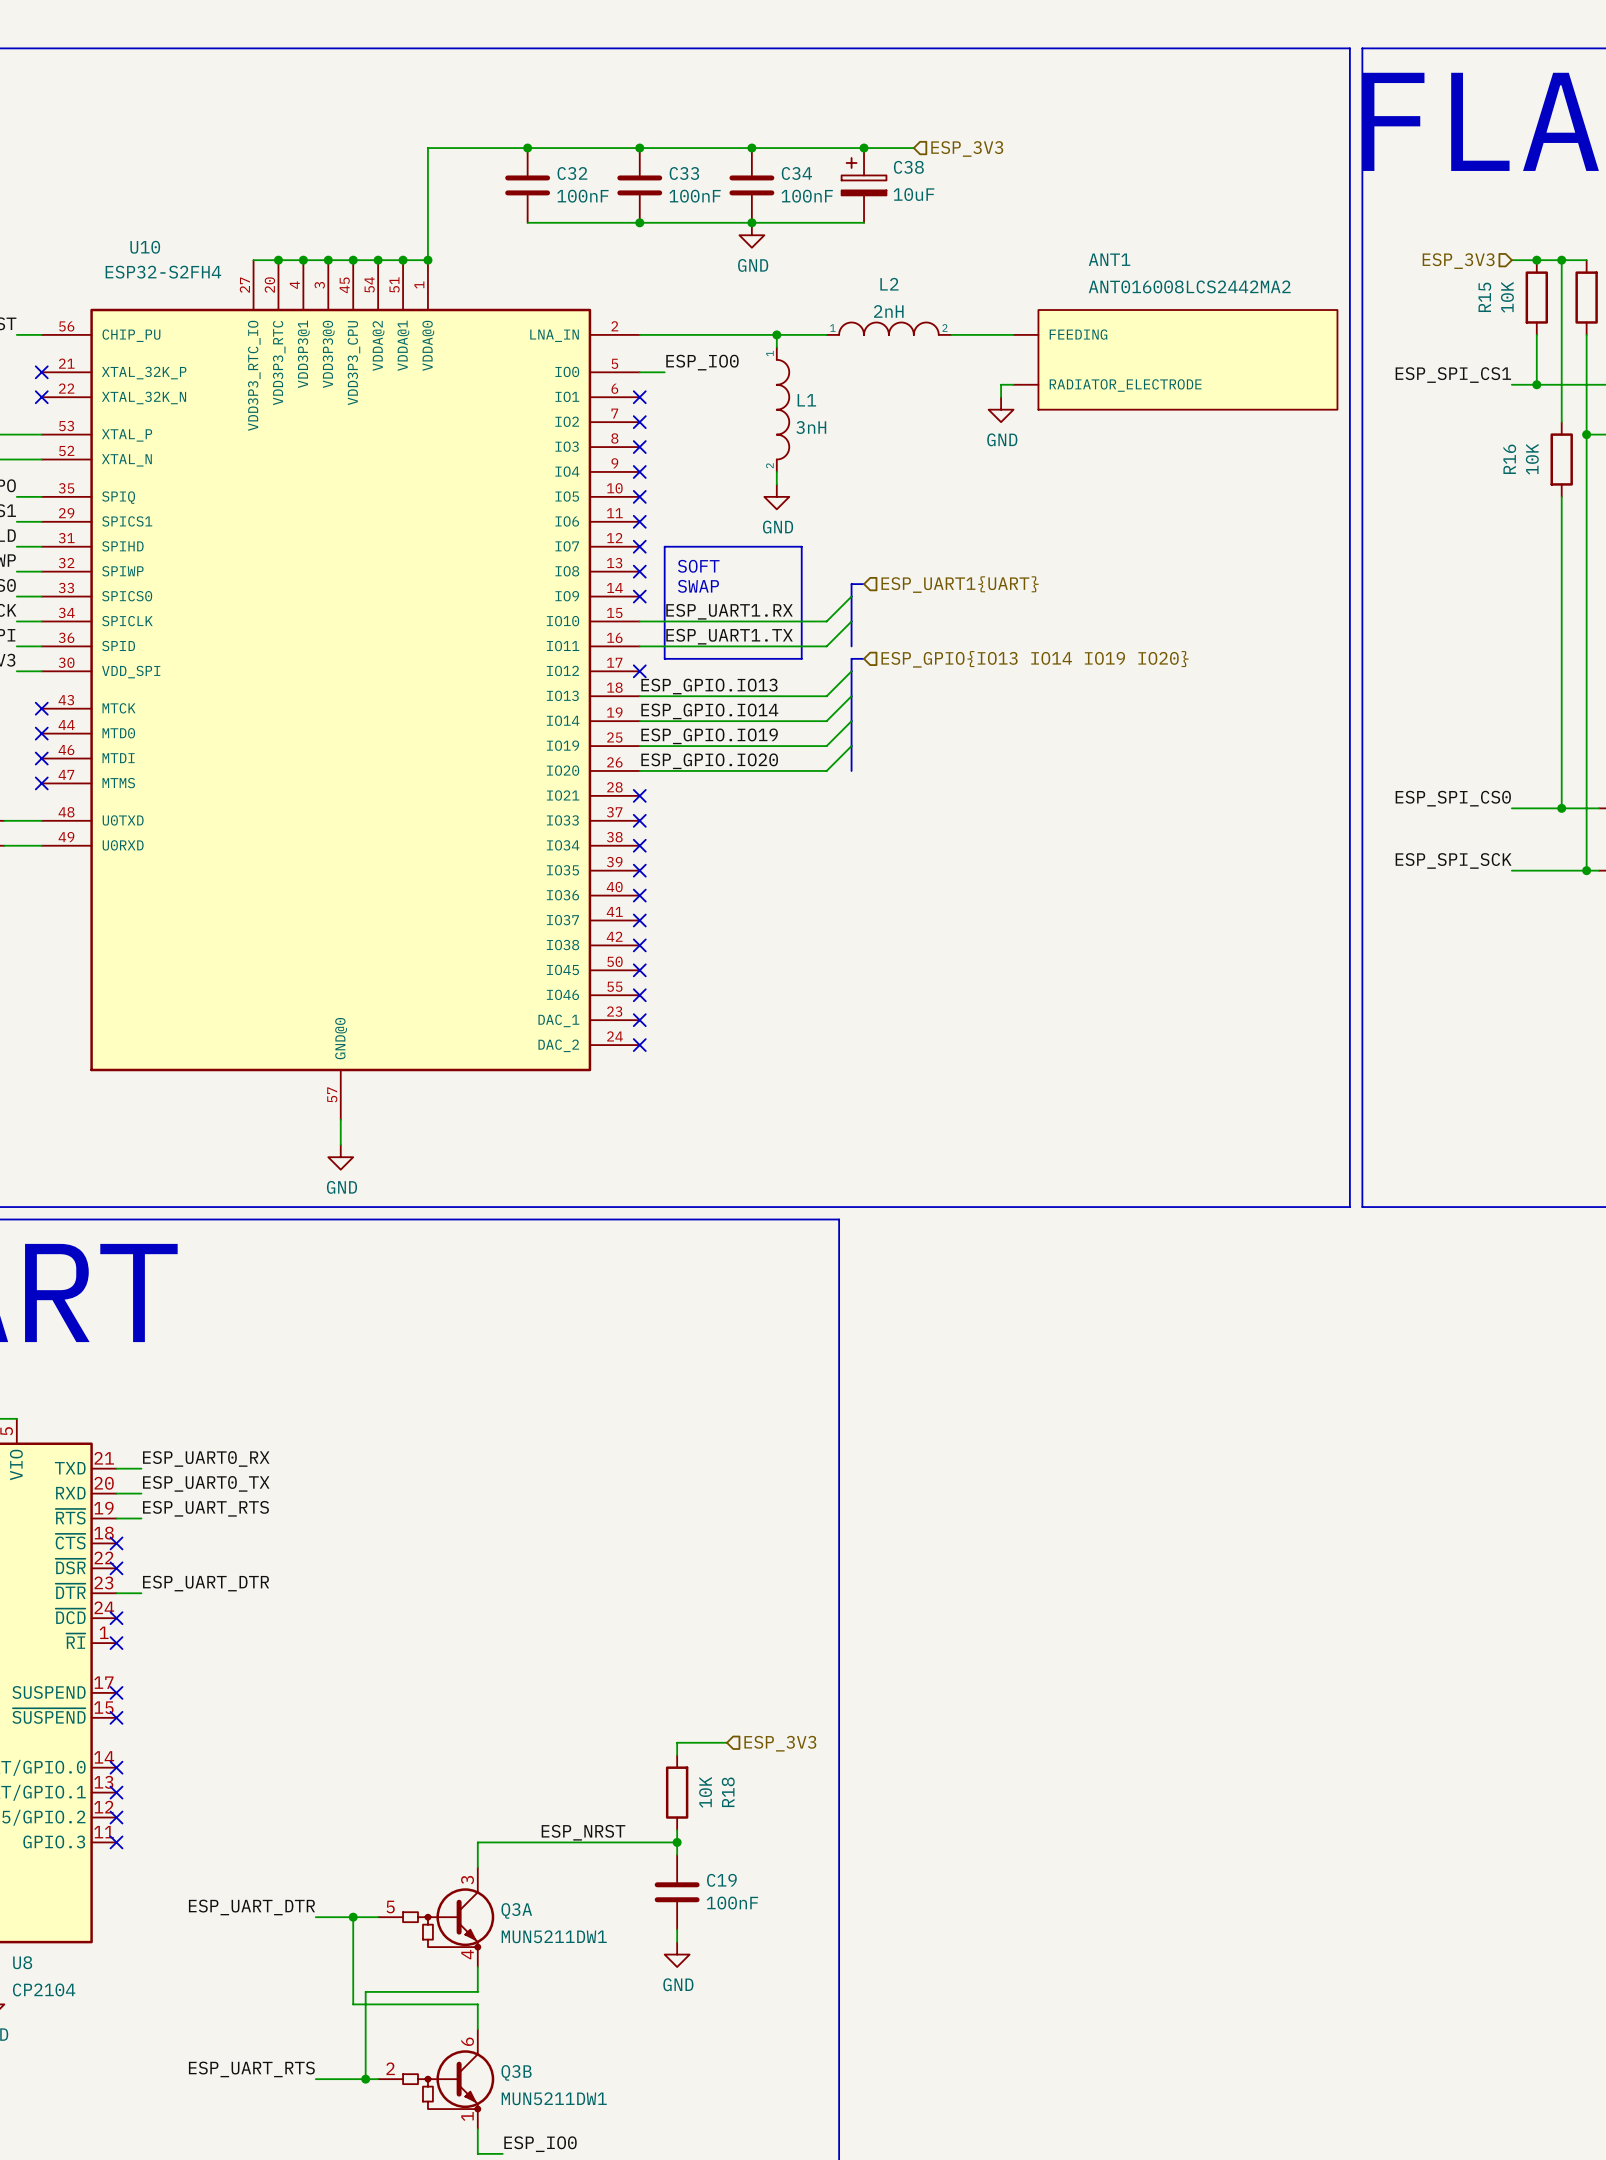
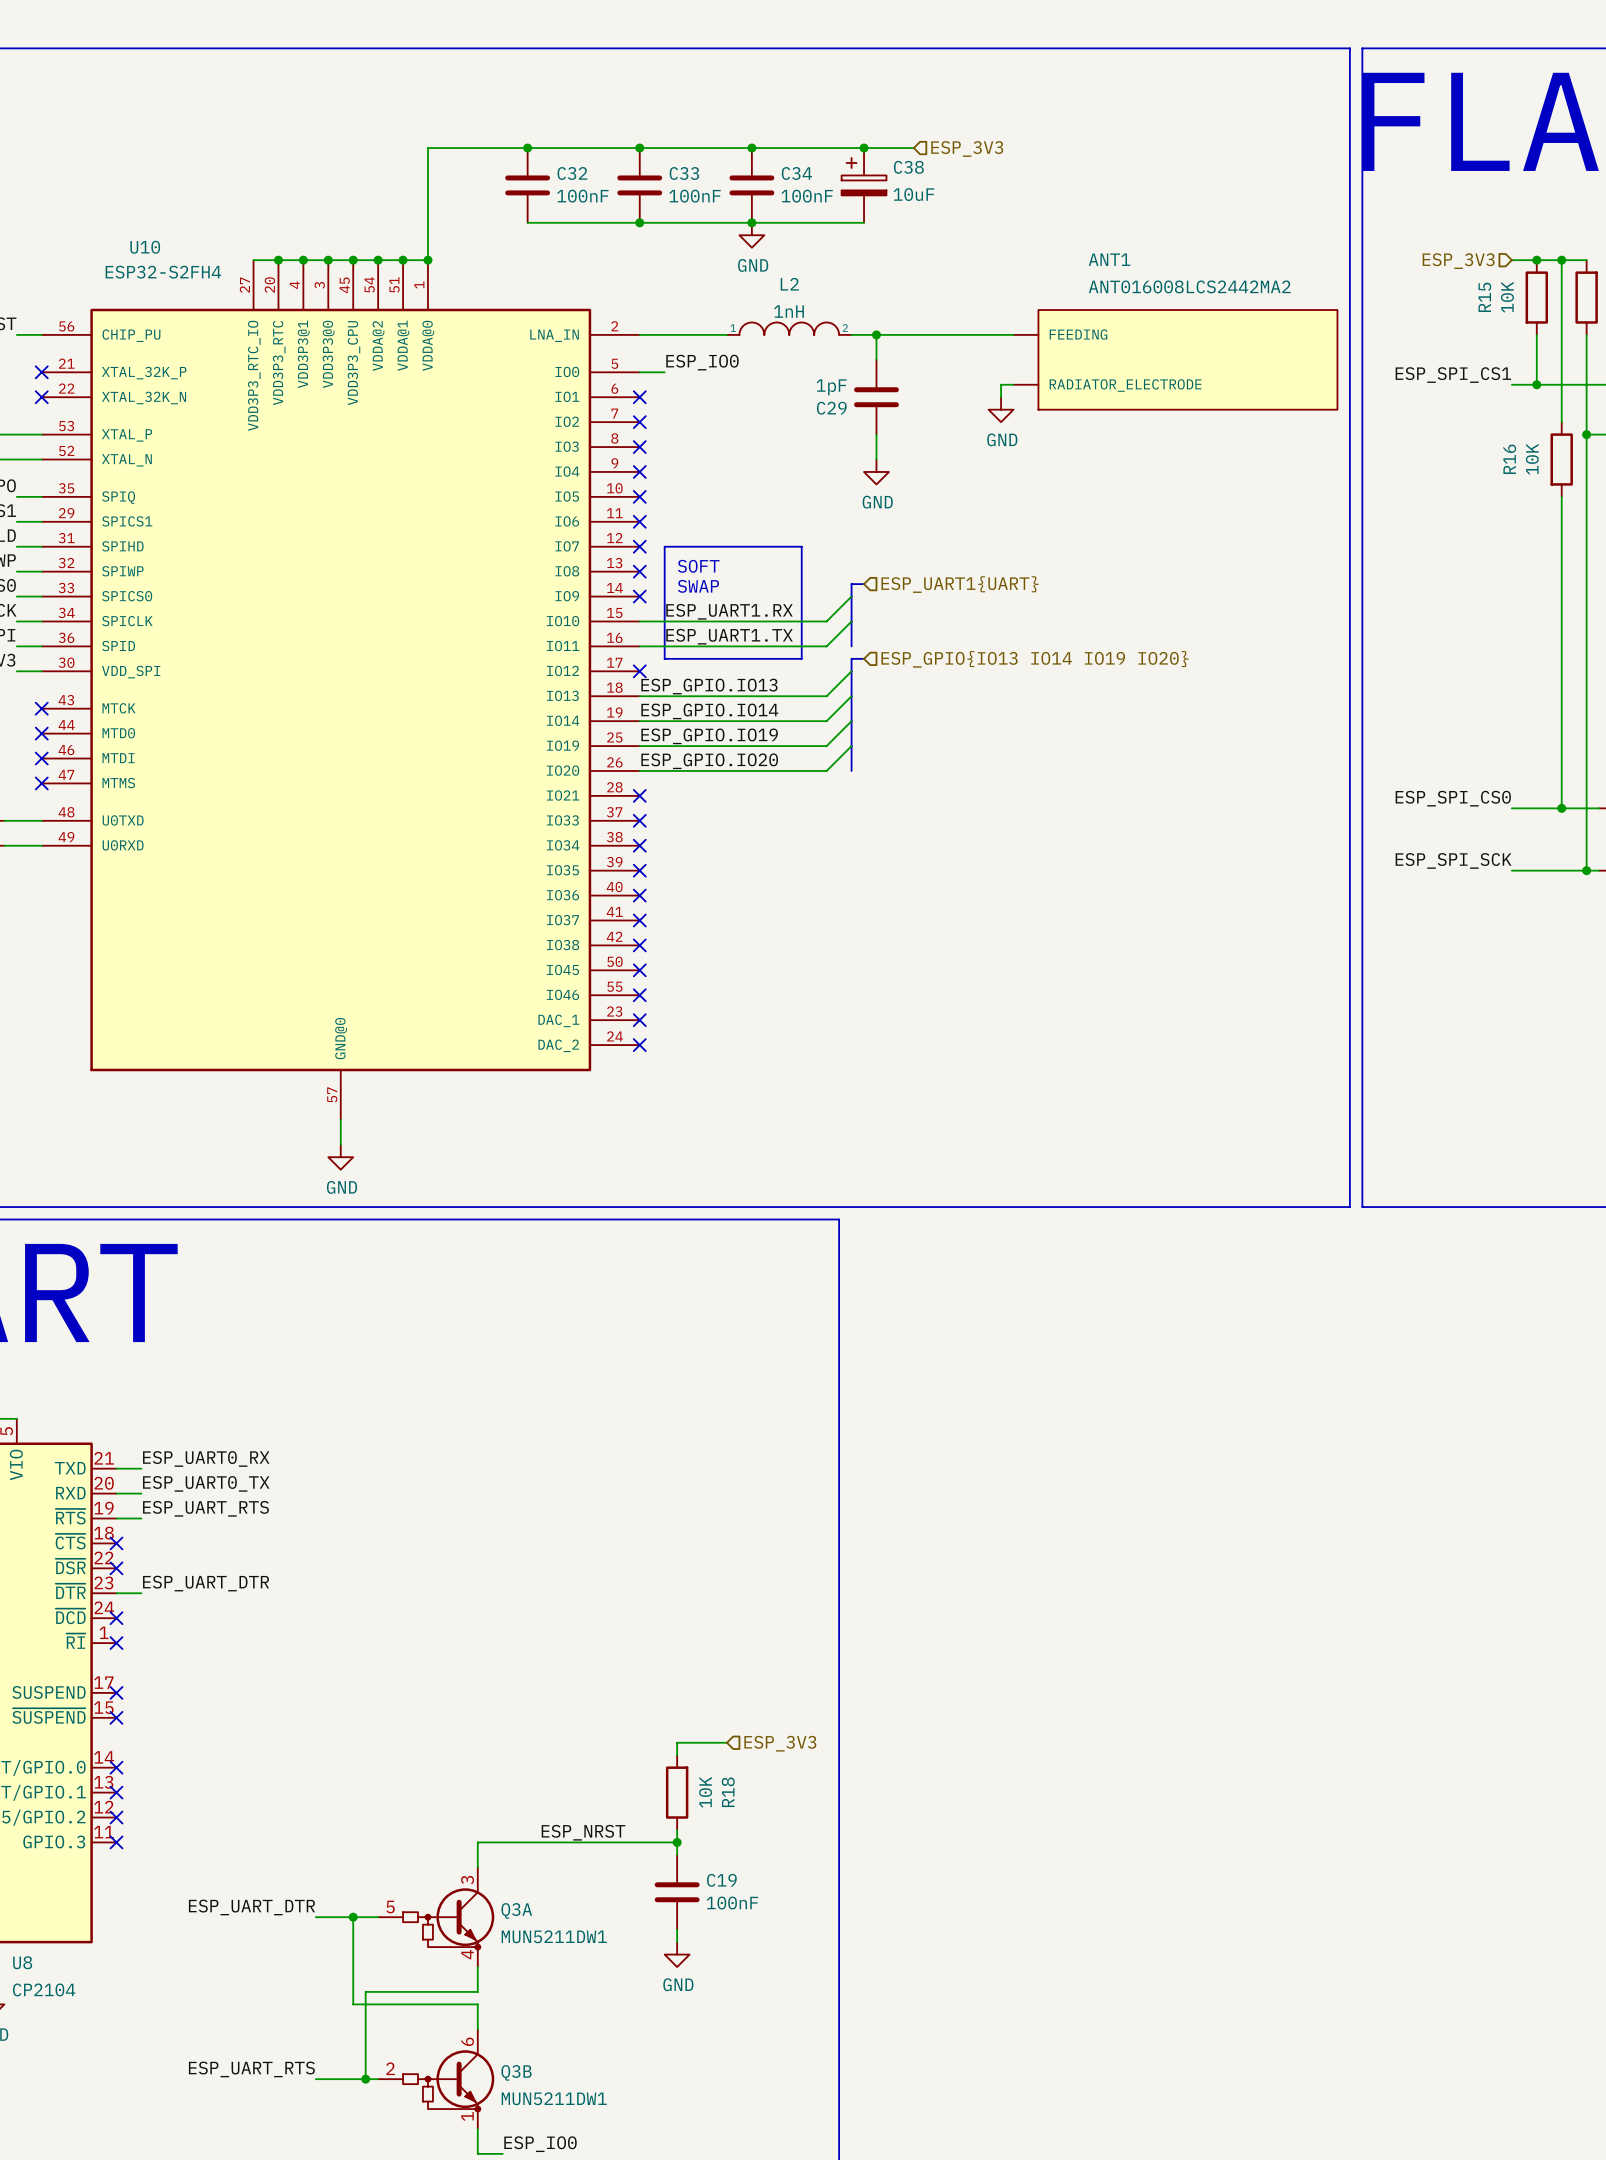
L2 value: 2nH (888, 311) -> 1nH (789, 311)
L2 position: (888, 328) -> (789, 328)
wire: (726, 334) (826, 334) -> (851, 334) (951, 334)
wire: (776, 334) (776, 347) -> none
junction: (776, 334) -> none
wire: none -> (876, 334) (876, 359)
junction: none -> (876, 334)
C29: none -> 1pF (876, 397)
L1: 3nH (783, 409) -> none
wire: none -> (876, 434) (876, 459)
wire: (776, 471) (776, 484) -> none
power symbol position: GND (776, 496) -> GND (876, 471)

